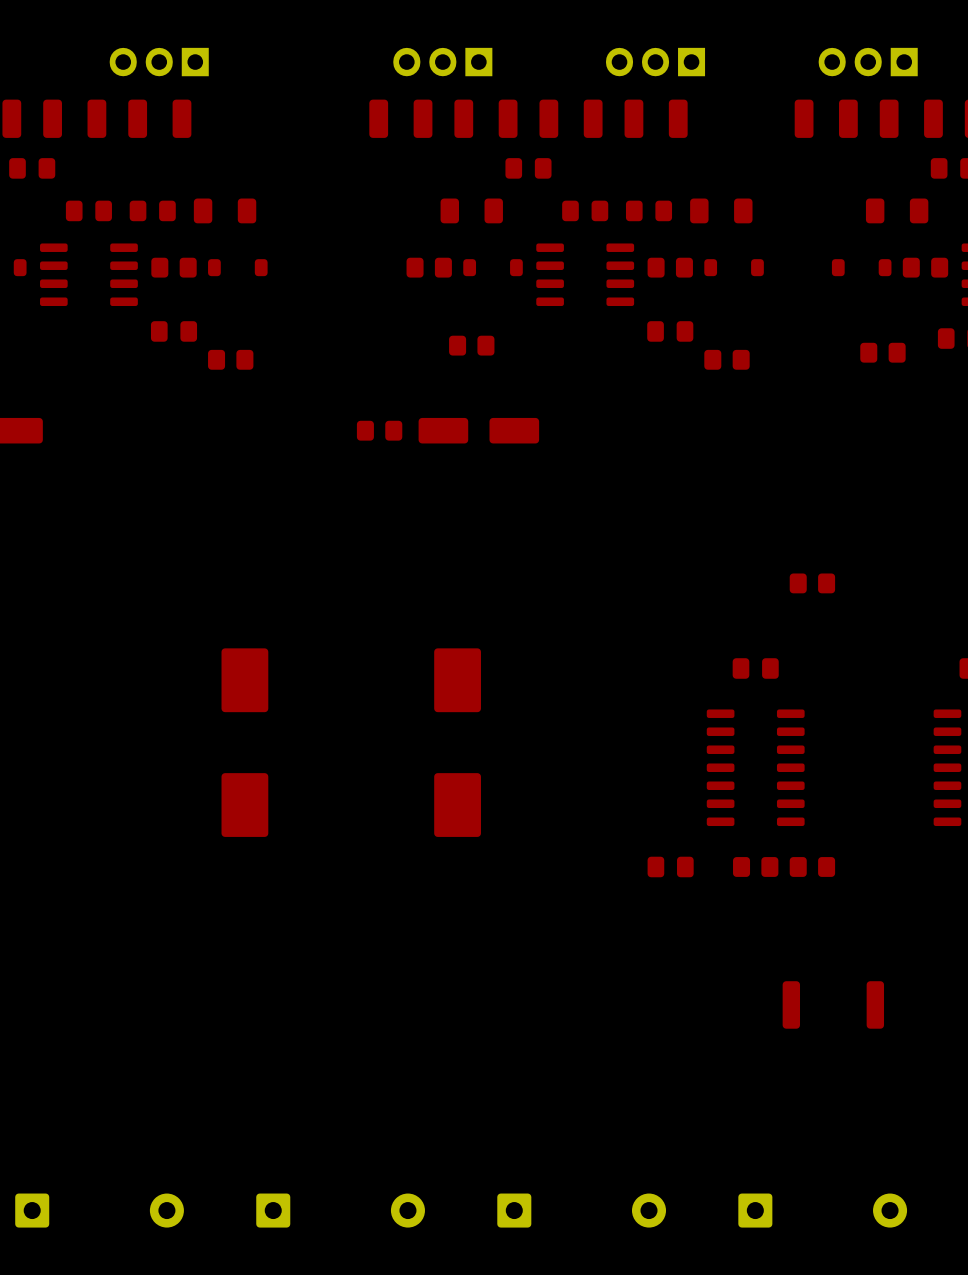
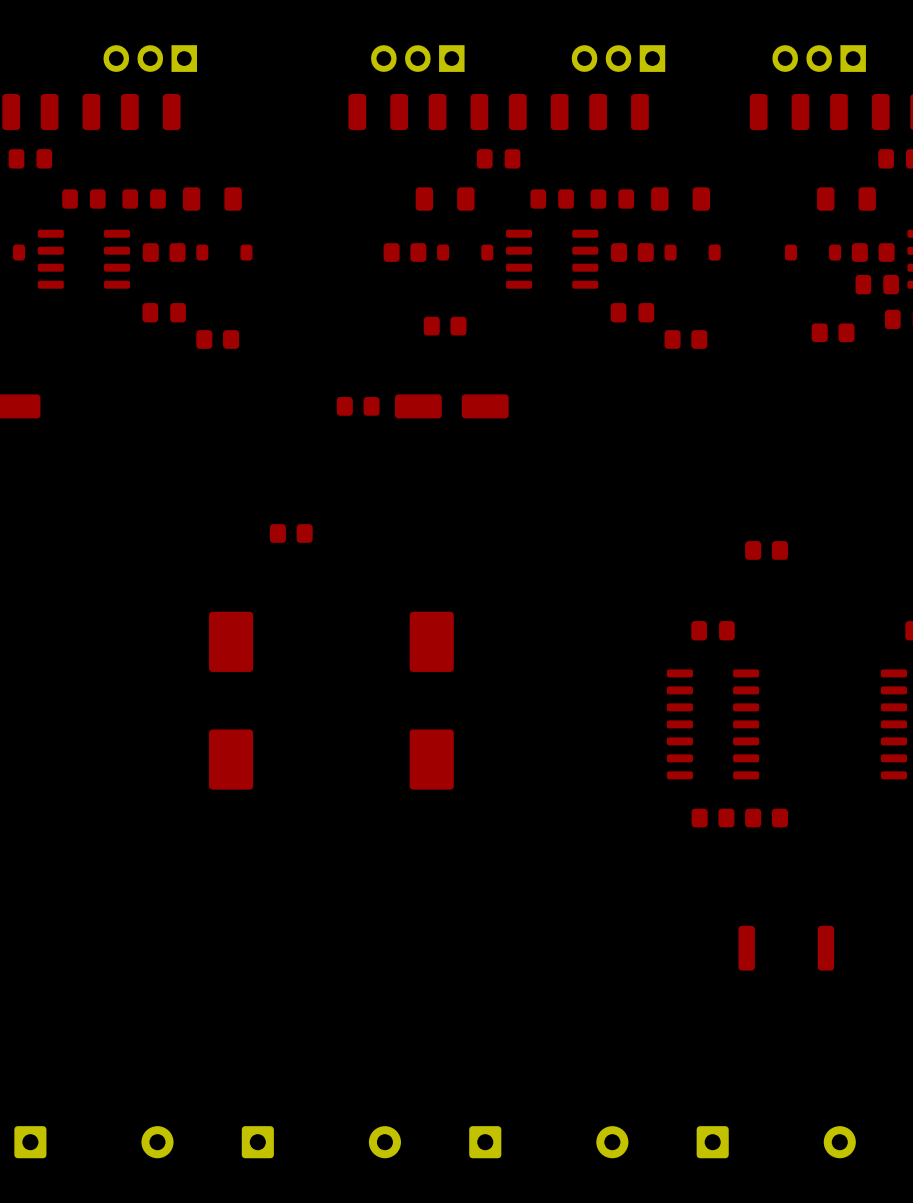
part: none -> (877, 284)
part: none -> (291, 533)
part: (670, 866) -> none

